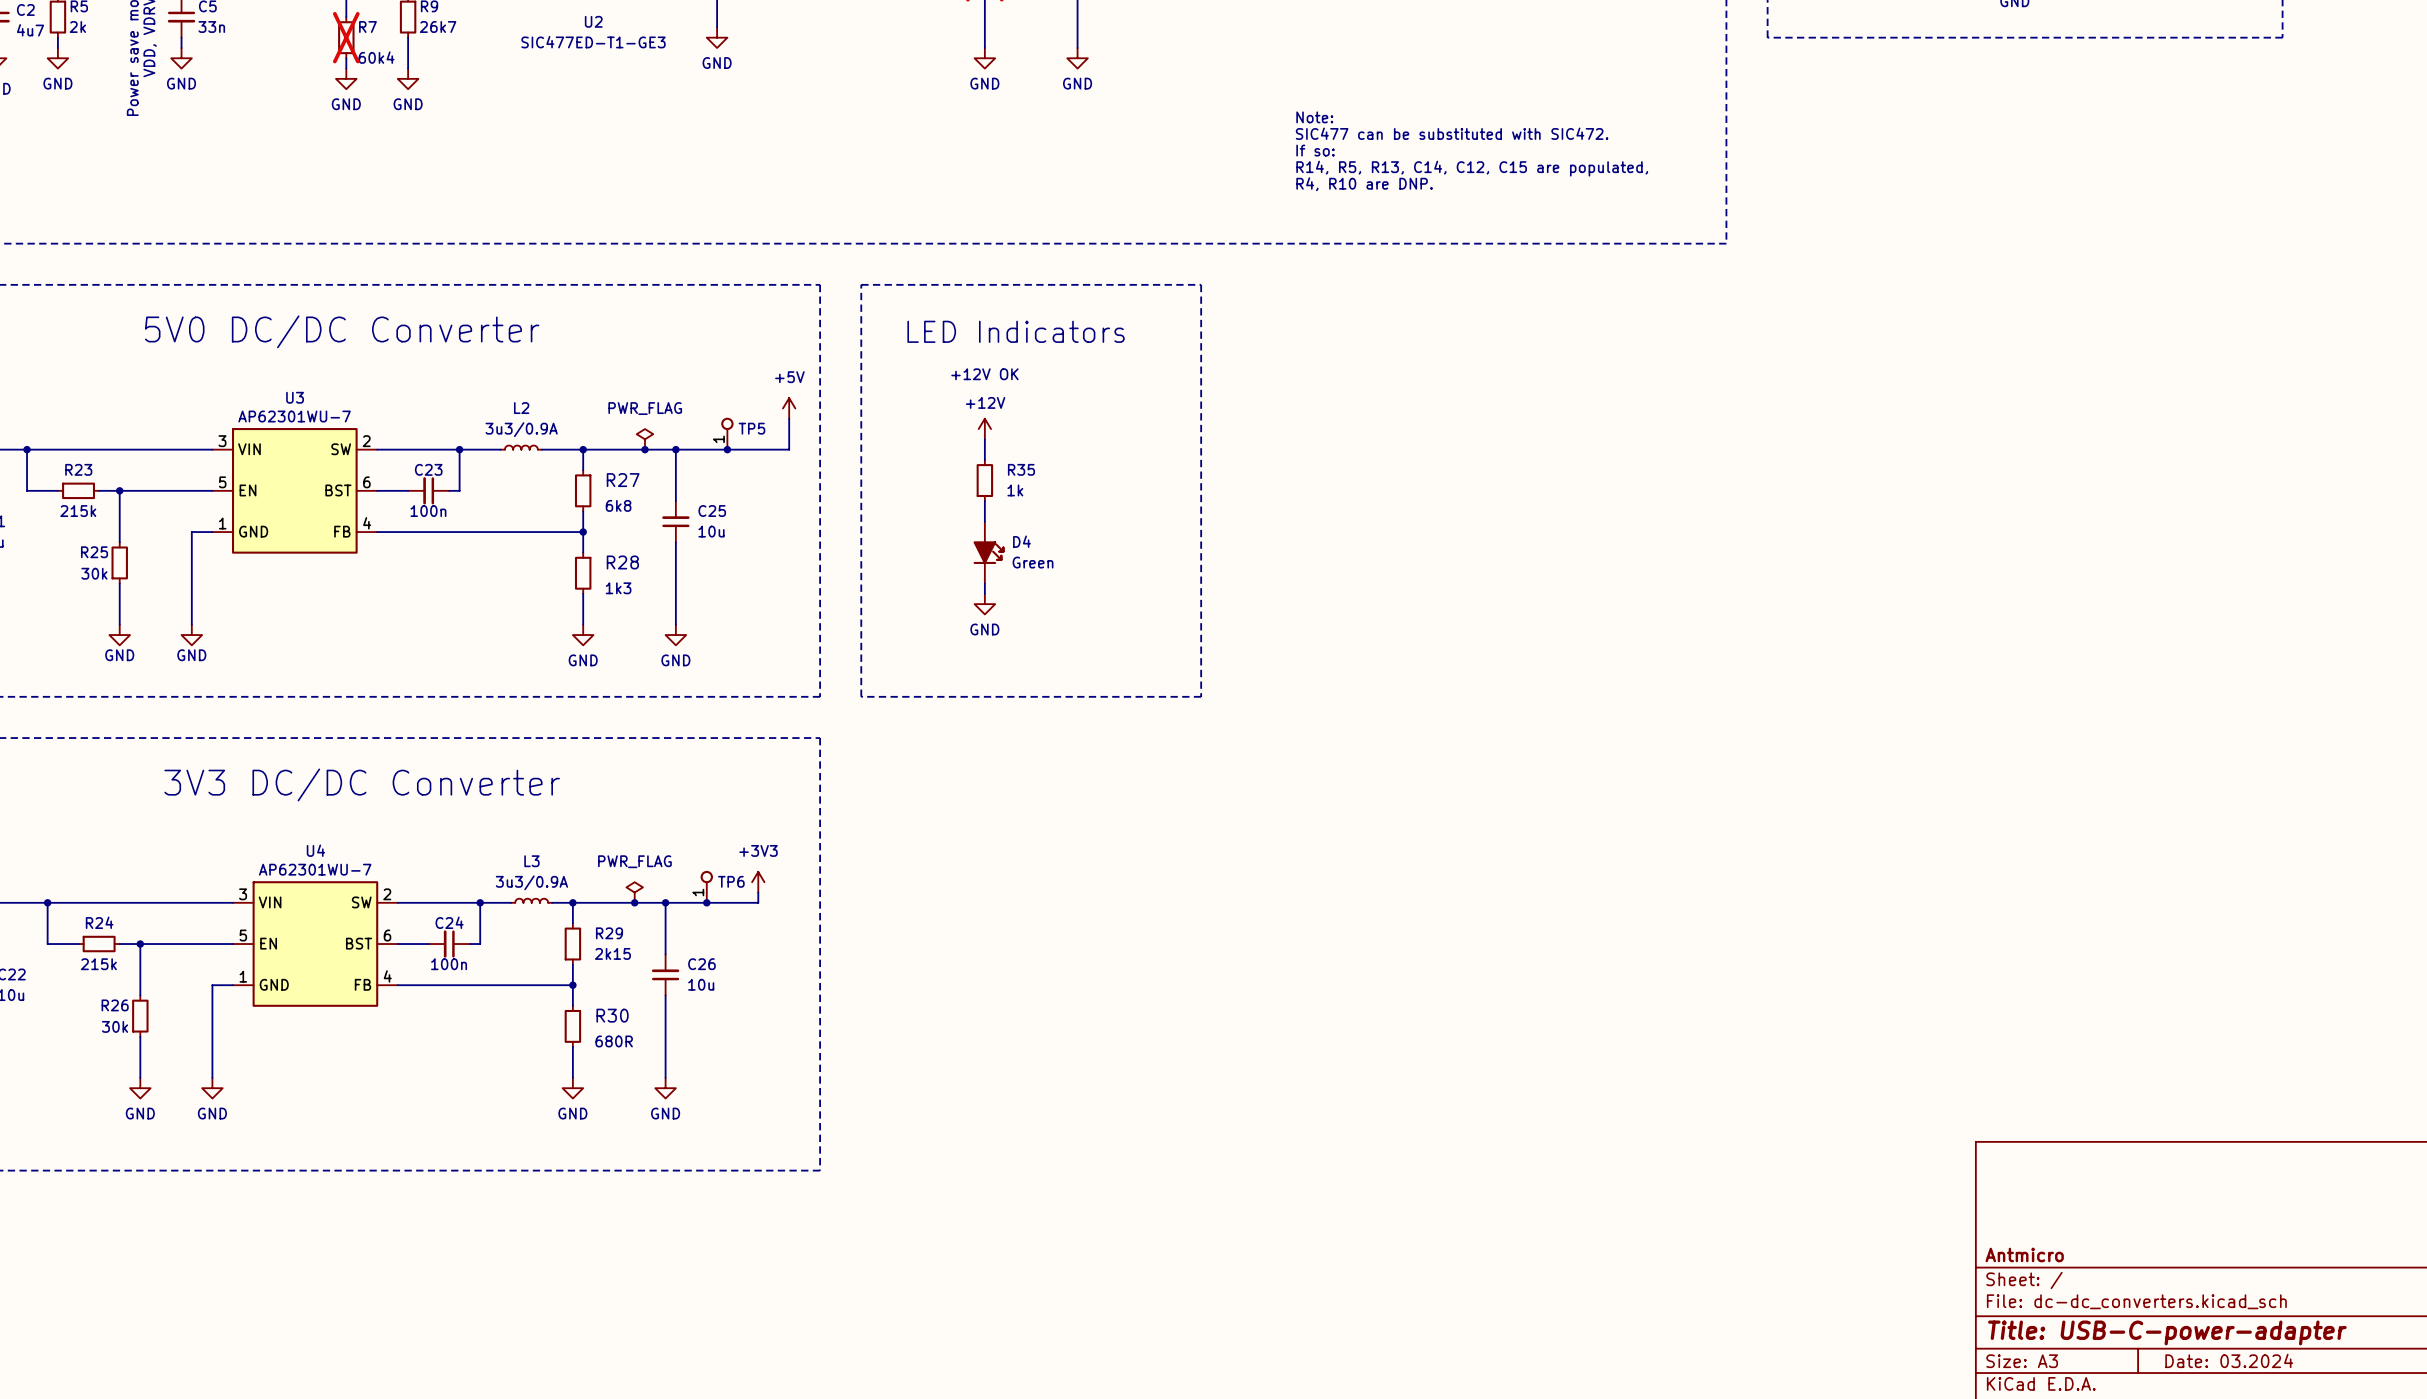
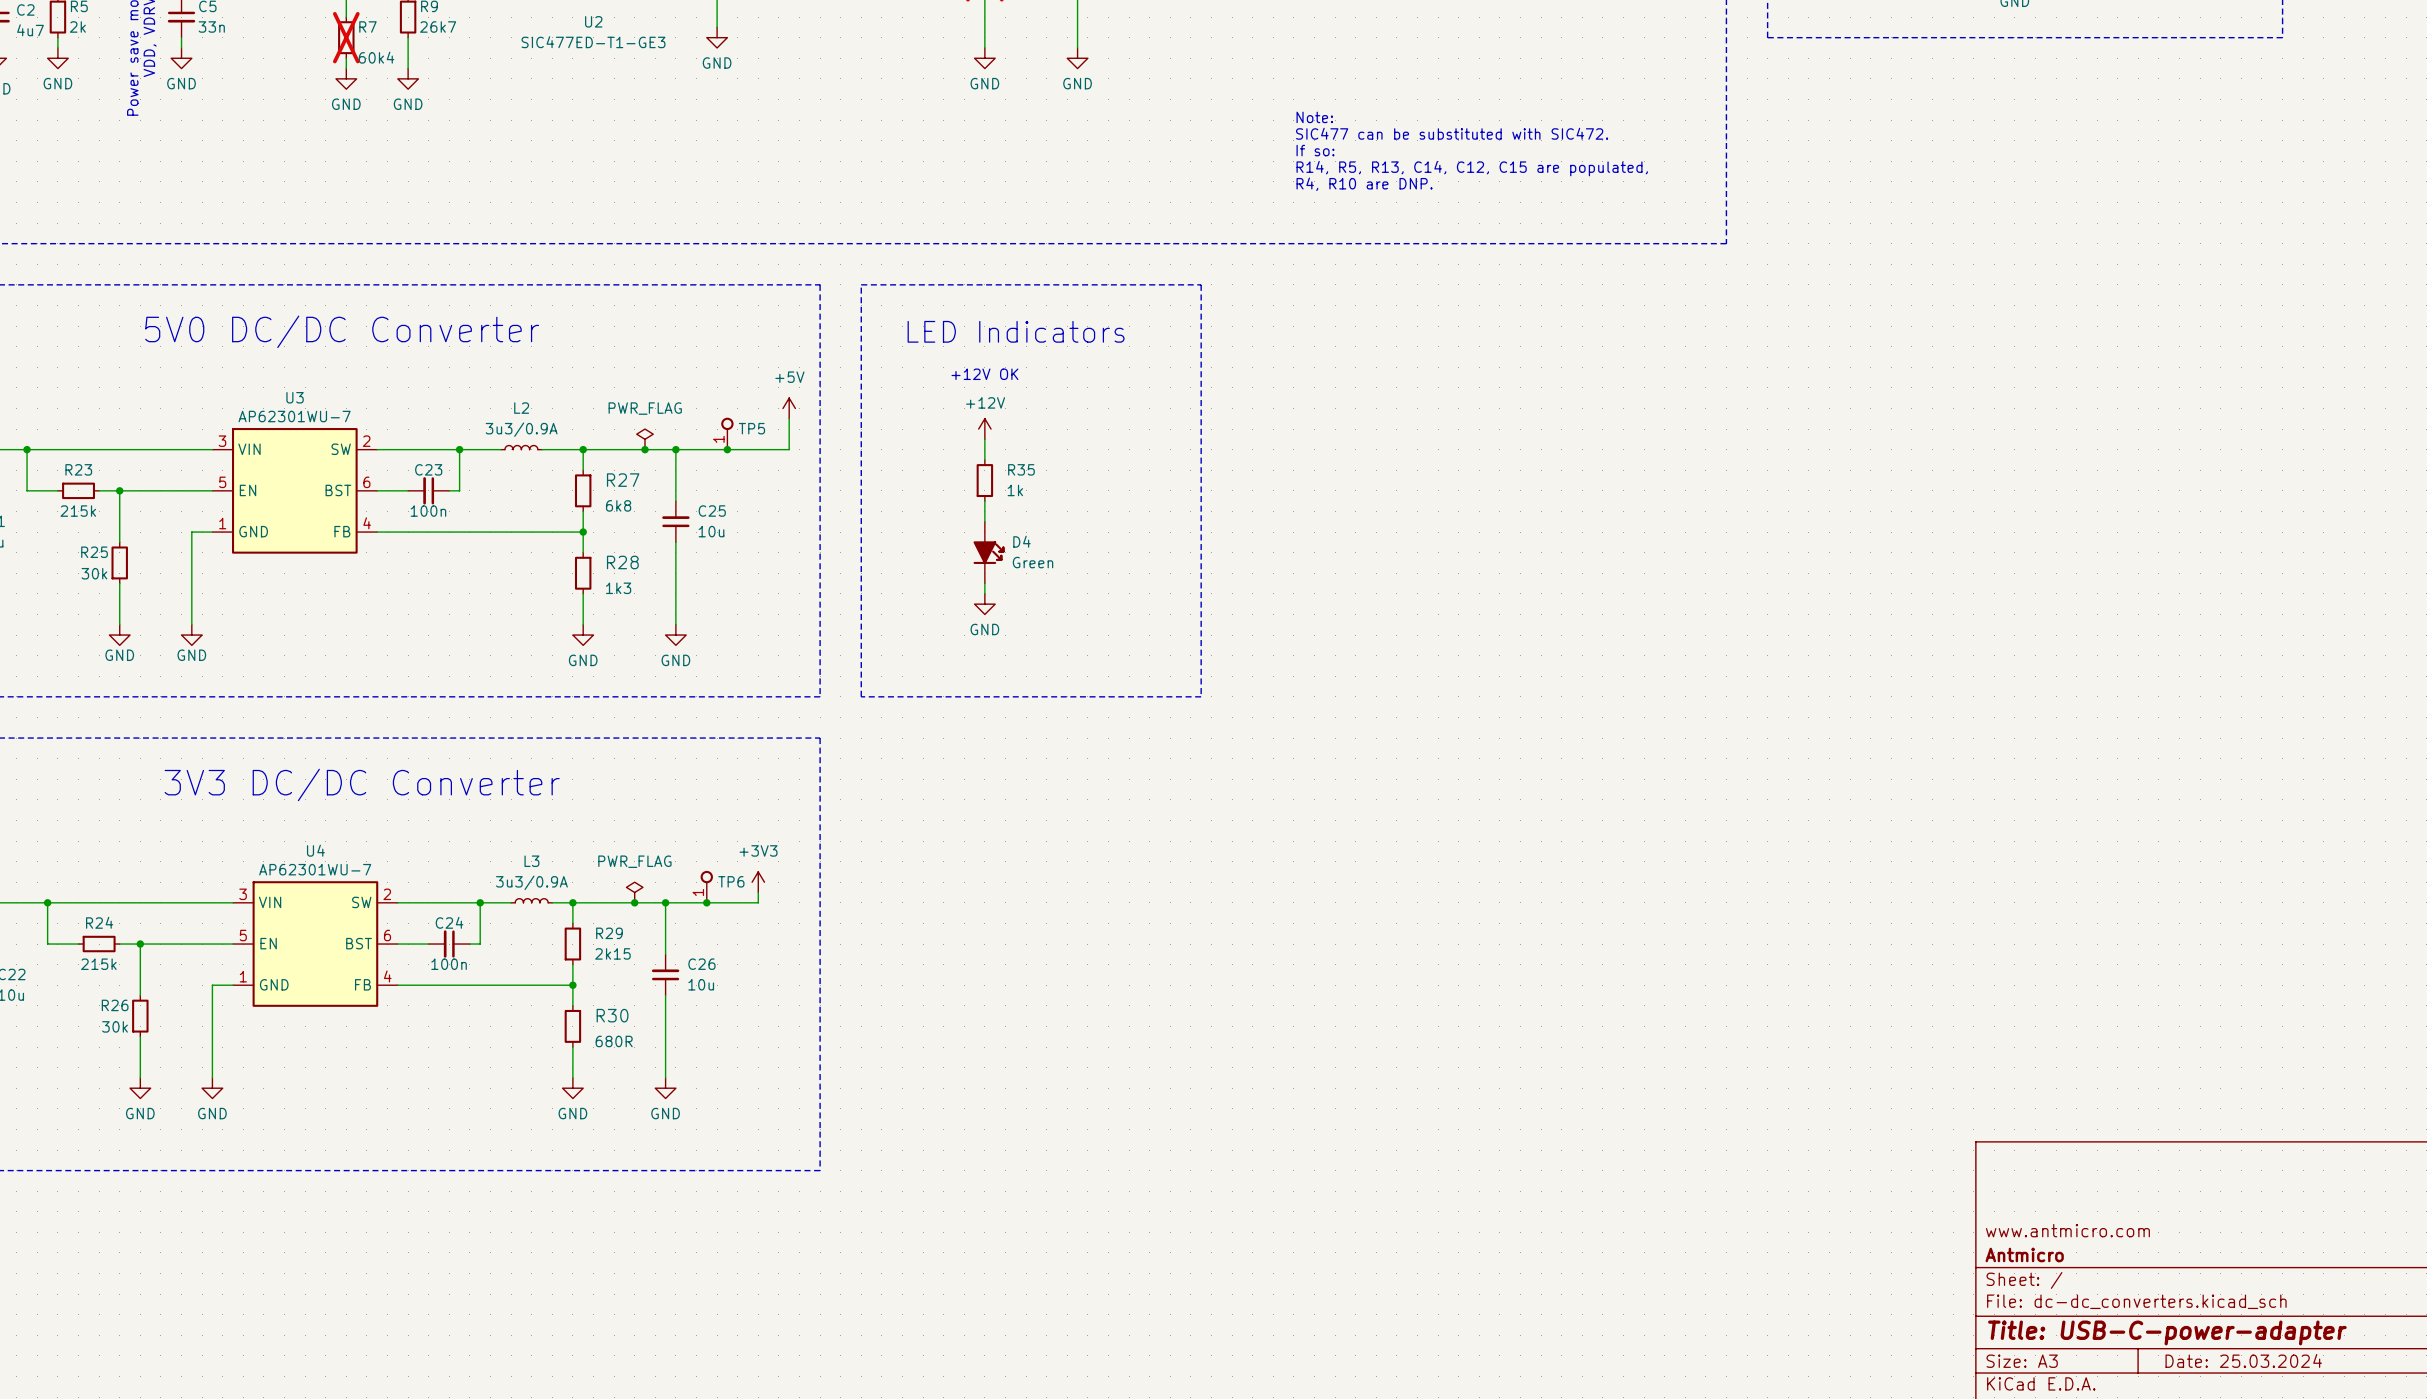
title block: none -> www.antmicro.com (2067, 1230)
title block: Date: 03.2024 (2229, 1360) -> Date: 25.03.2024 (2243, 1360)

